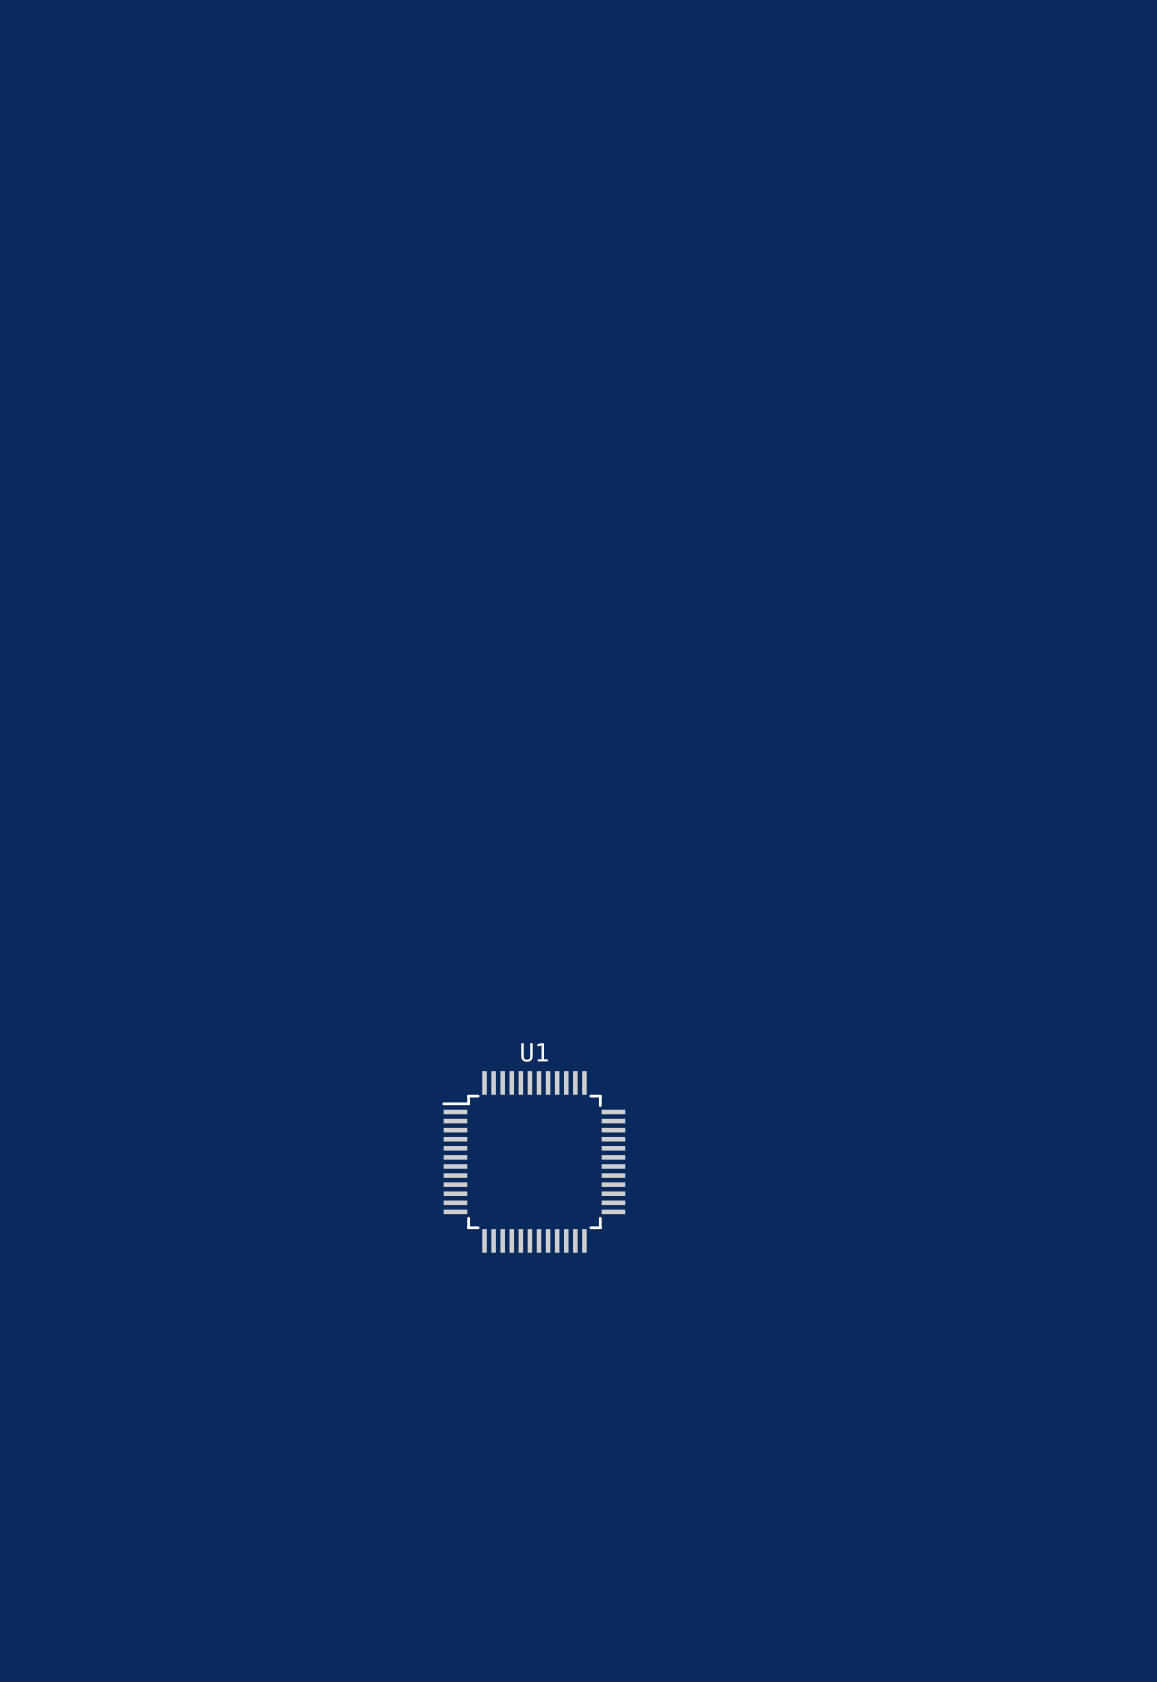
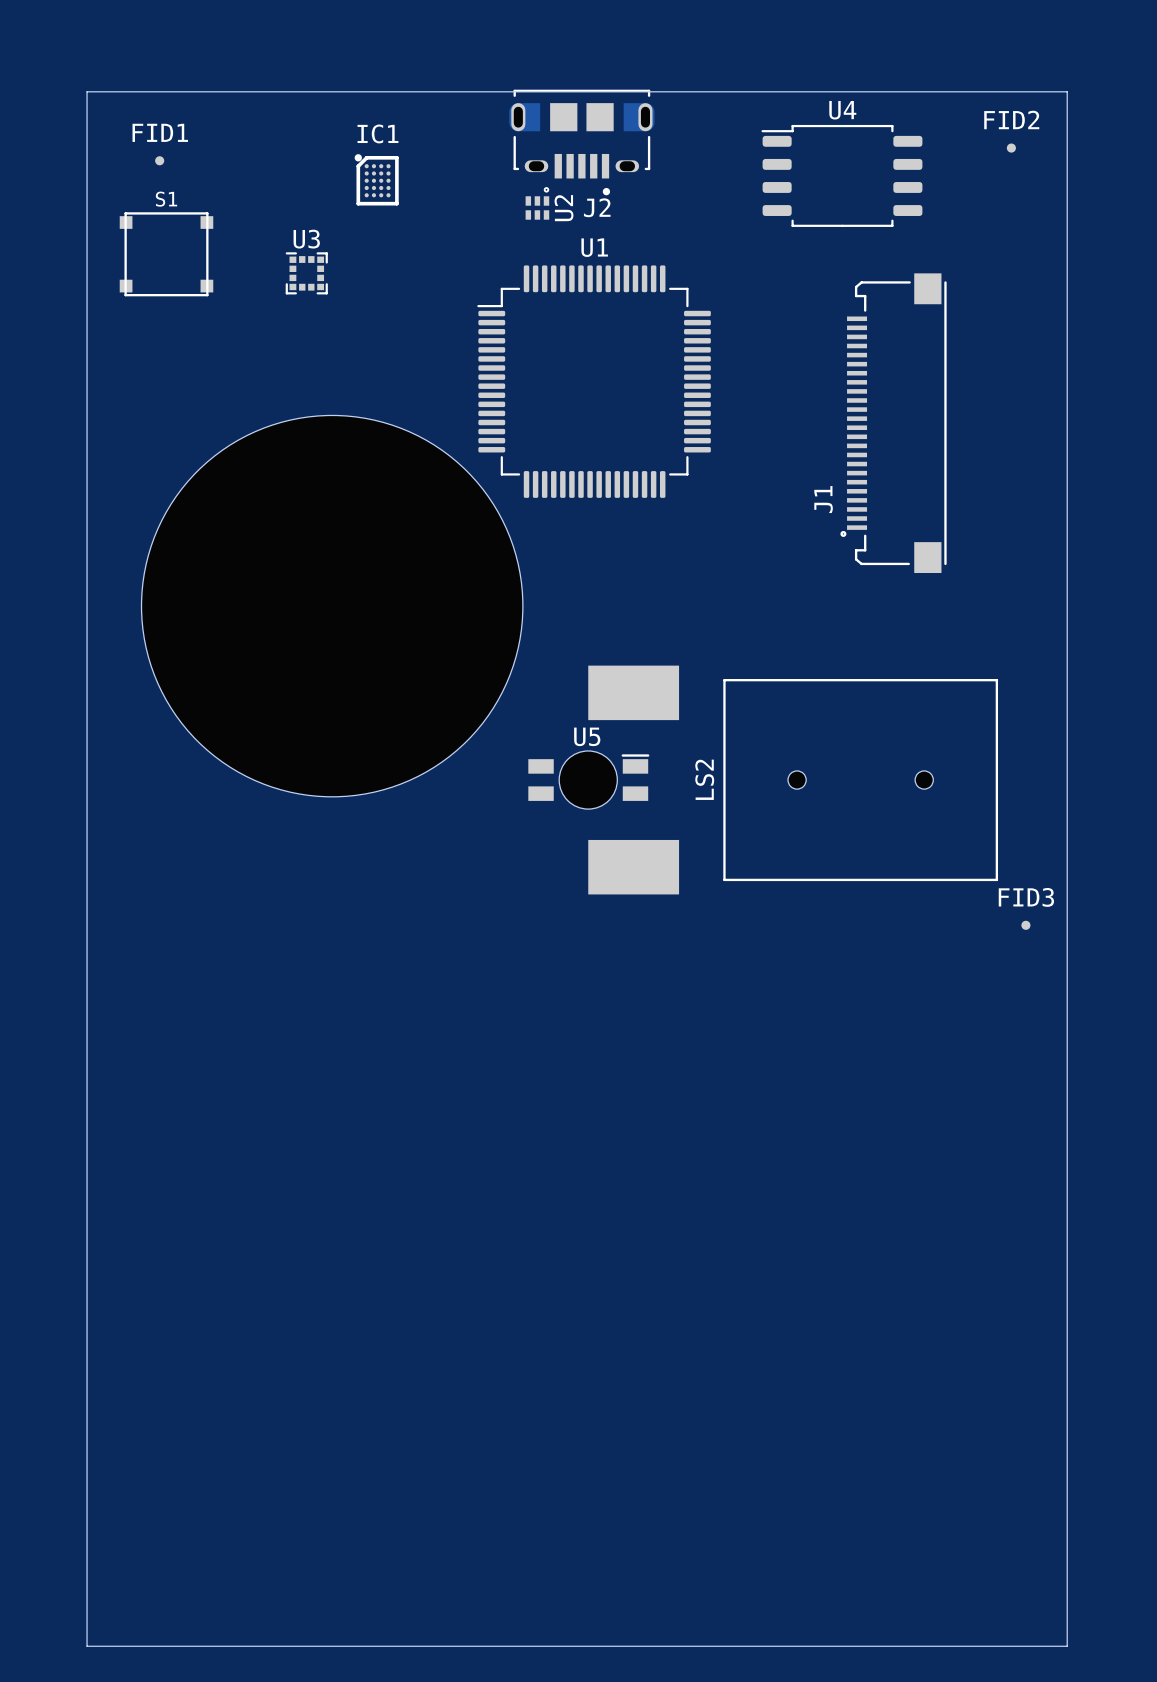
board edge: none -> (87, 91) (1067, 91) (1067, 1646) (87, 1646) (87, 91)
J2: none -> (581, 142)
FID2: none -> (1011, 148)
FID1: none -> (159, 160)
U4: none -> (841, 175)
IC1: none -> (376, 179)
U2: none -> (537, 203)
S1: none -> (166, 254)
U3: none -> (306, 273)
J1: none -> (893, 423)
part: none -> (332, 606)
U5: none -> (588, 780)
LS2: none -> (793, 780)
FID3: none -> (1025, 925)
U1 footprint: [442, 1071, 626, 1253] -> [477, 265, 711, 498]

